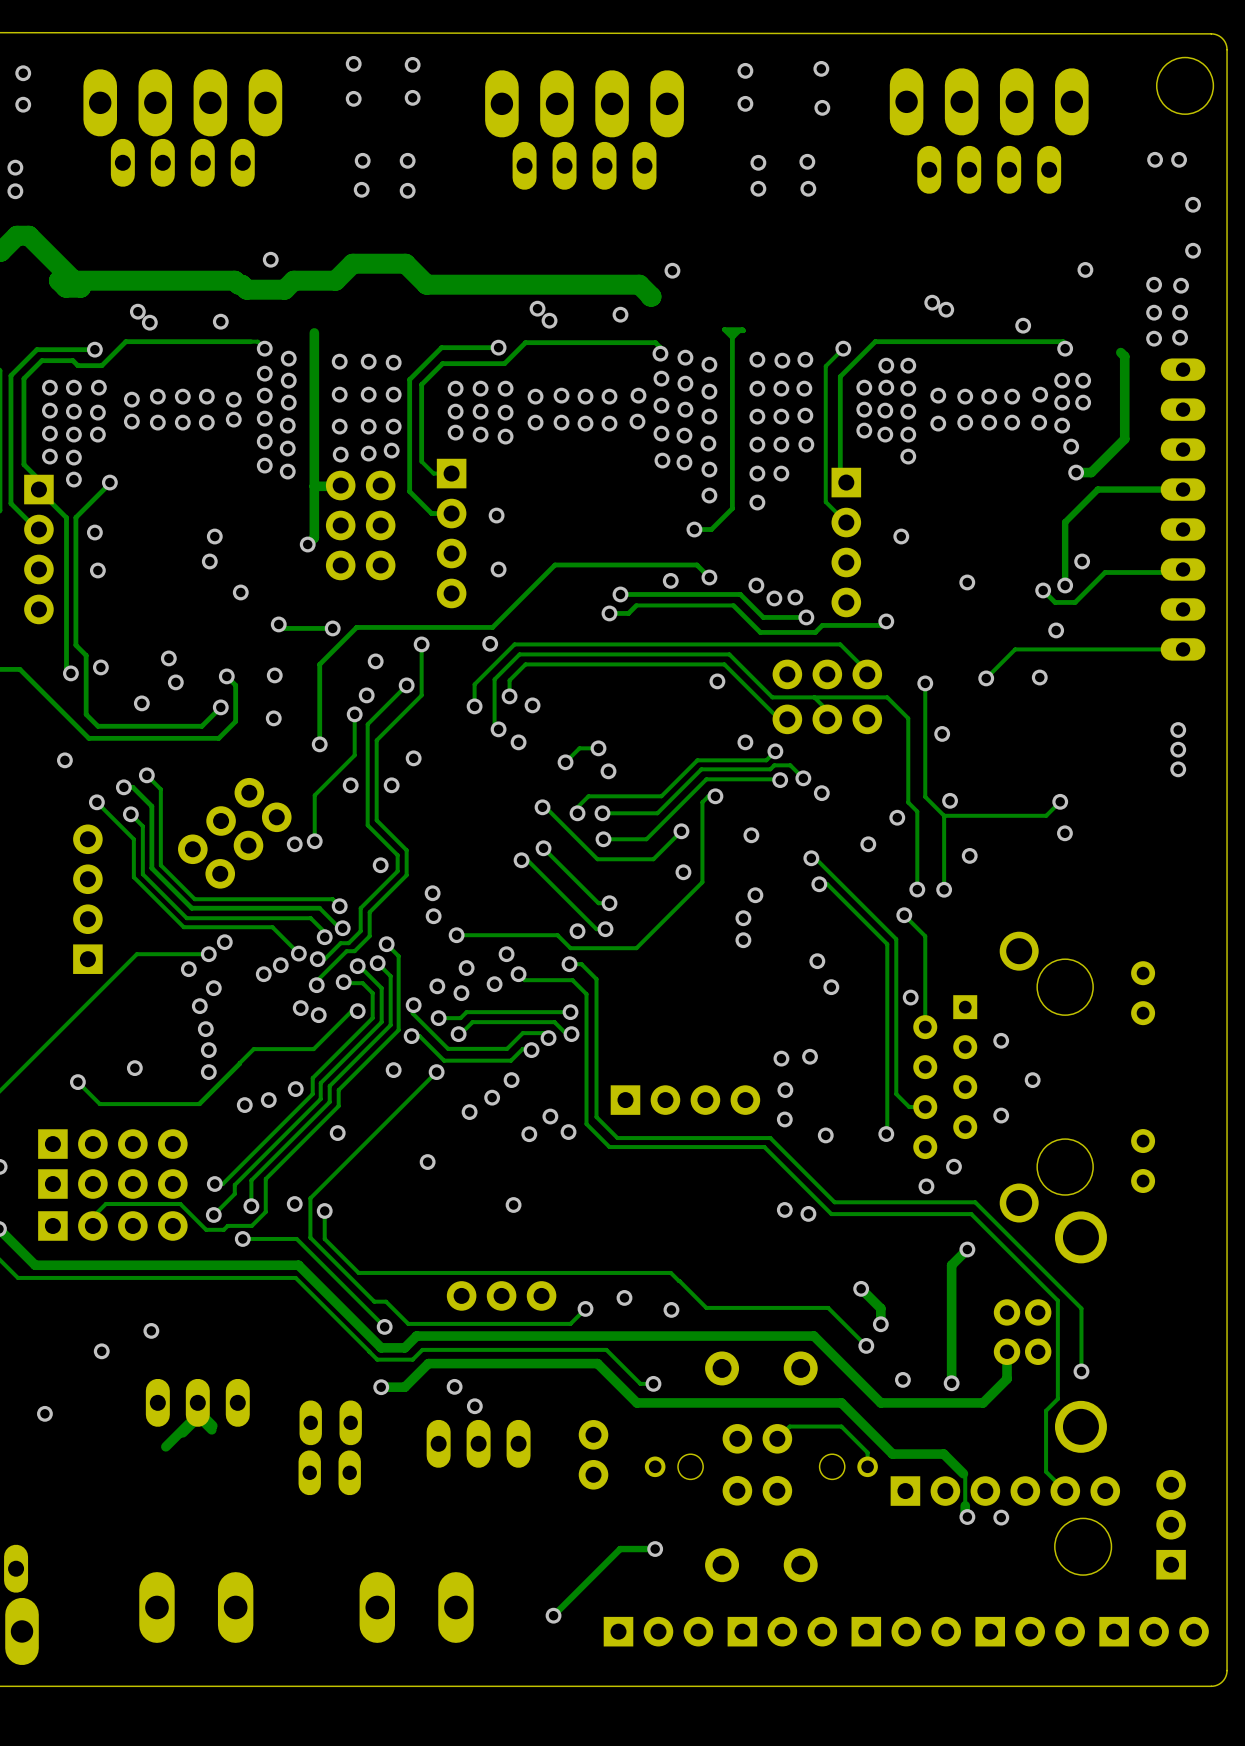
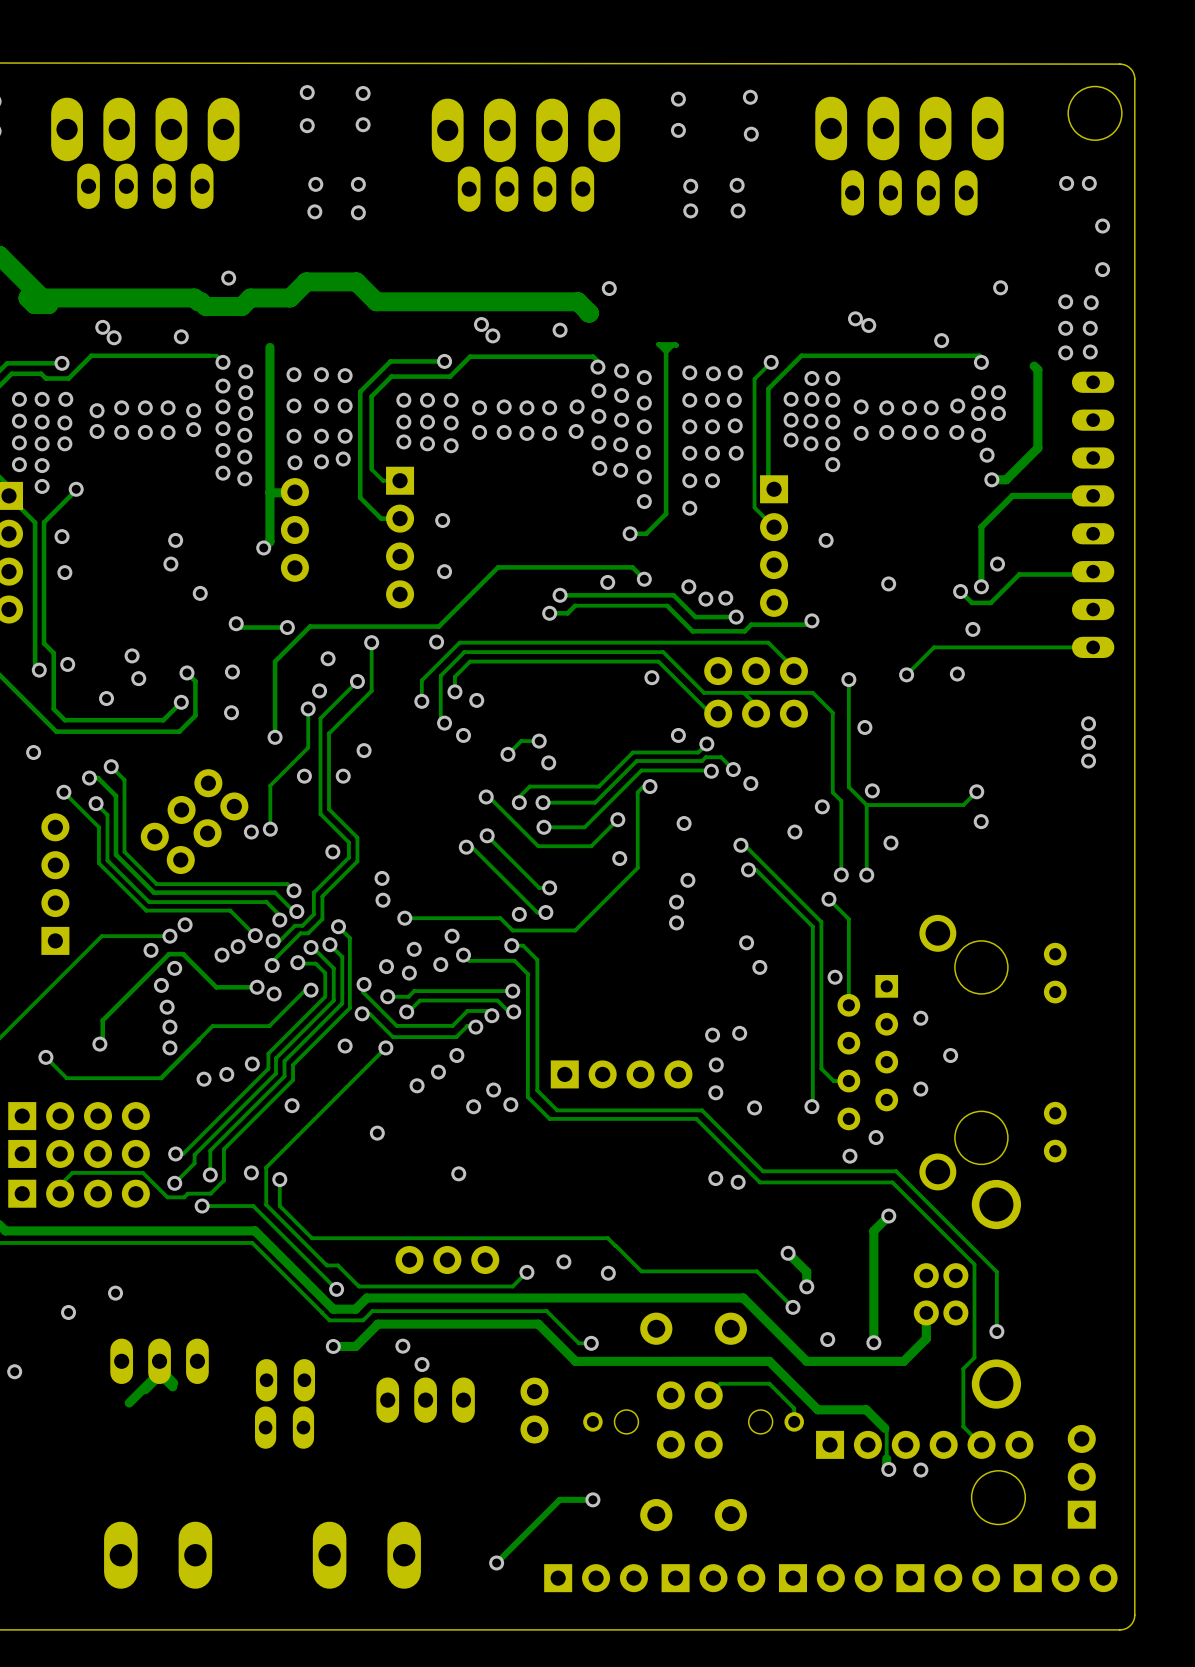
part: (380, 525) -> none
track: none -> (257, 987) (216, 987) (183, 954) (169, 954) (102, 1020) (102, 1041) (99, 1044)

